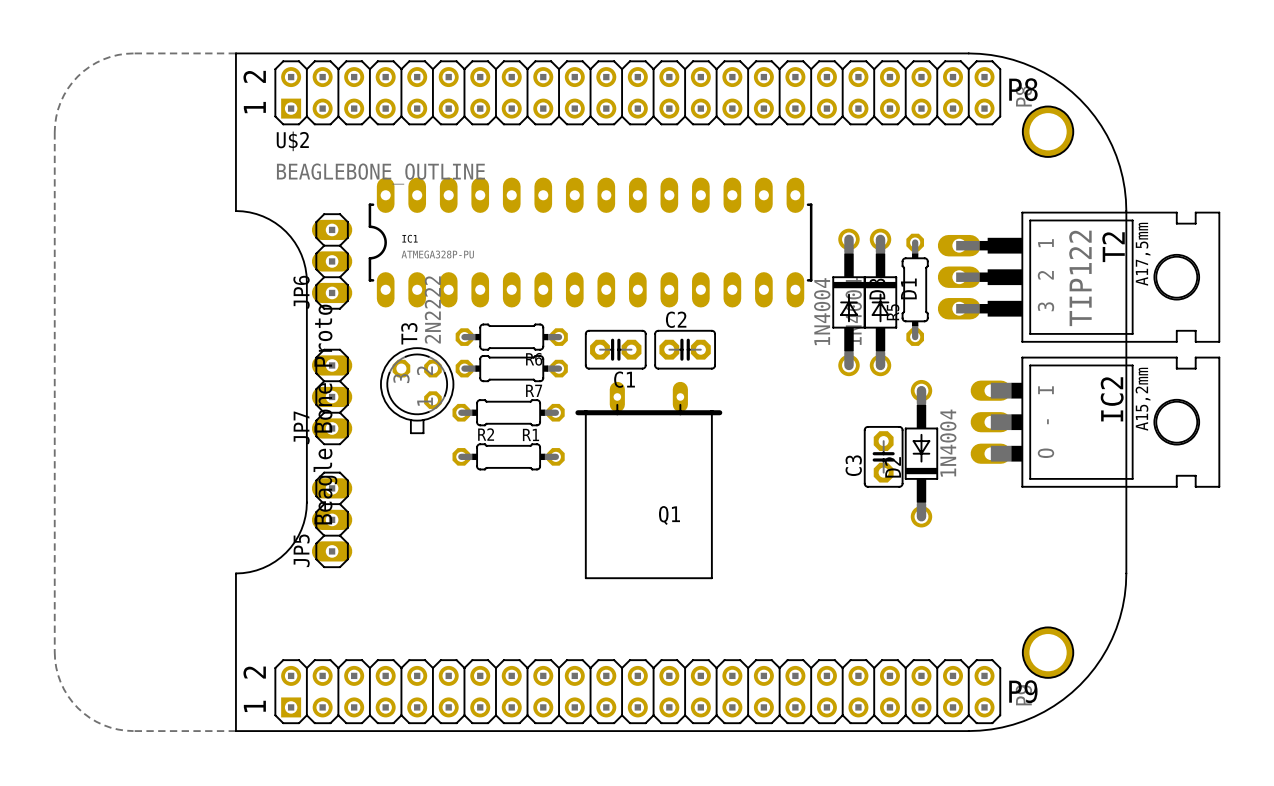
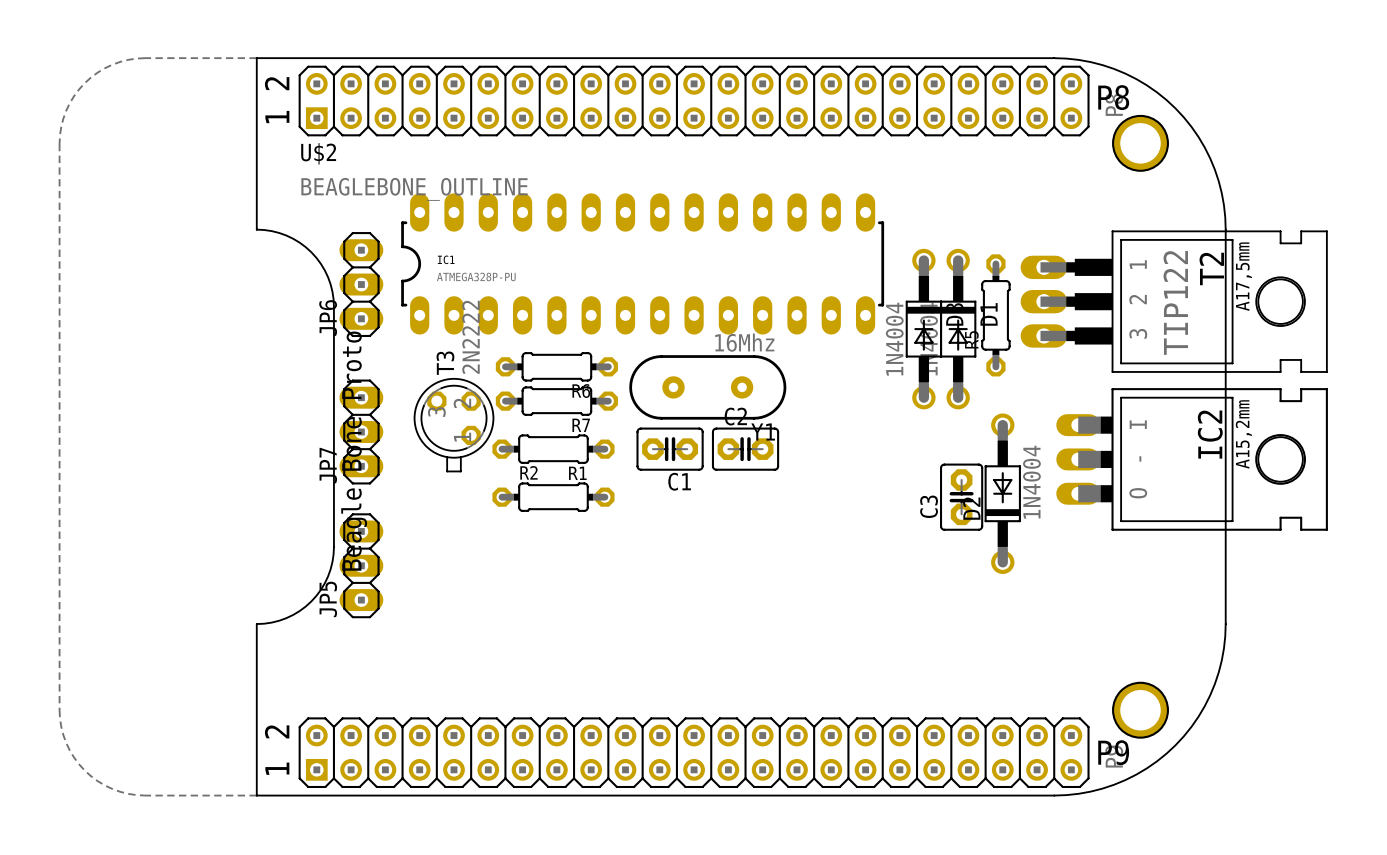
C1 position: (615, 349) -> (670, 449)
C2 position: (685, 349) -> (745, 449)
Y1: none -> 16Mhz (707, 387)
Q1: (648, 480) -> none

